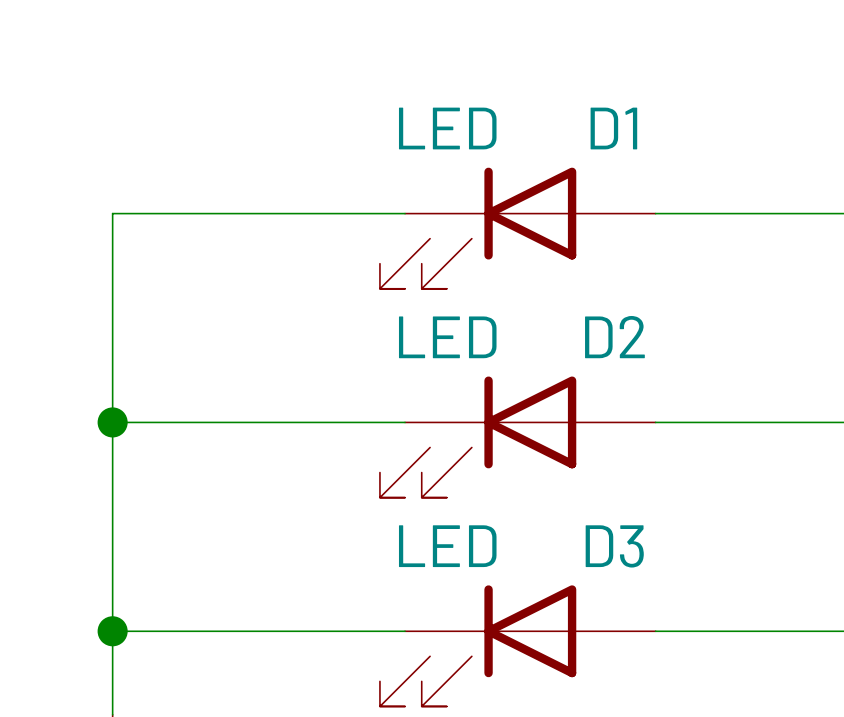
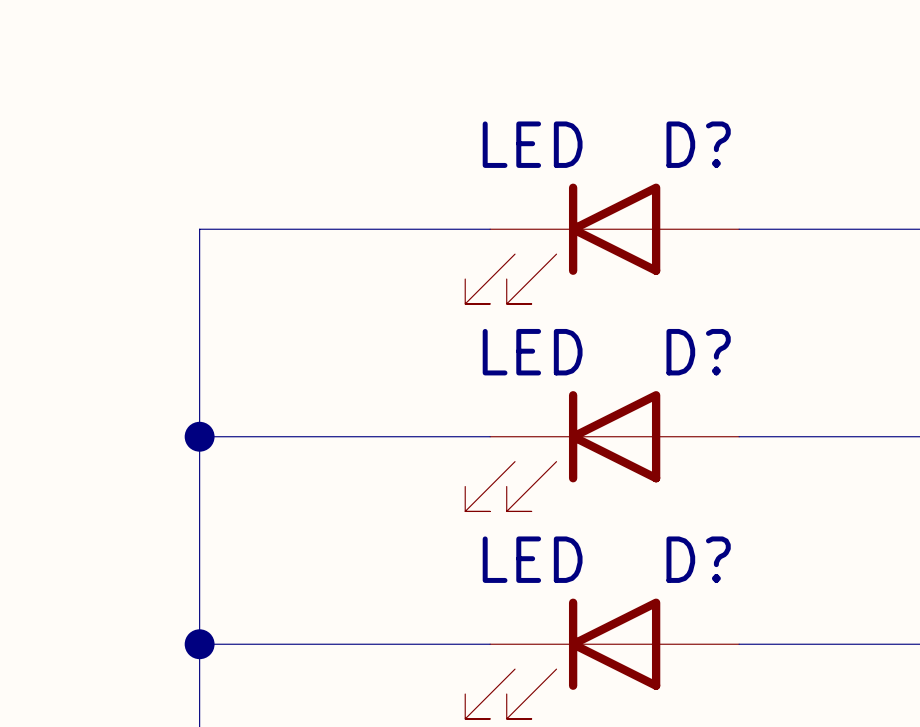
D1 name: D1 (613, 128) -> D? (698, 144)
D2 name: D2 (614, 337) -> D? (698, 352)
D3 name: D3 (614, 546) -> D? (698, 559)

